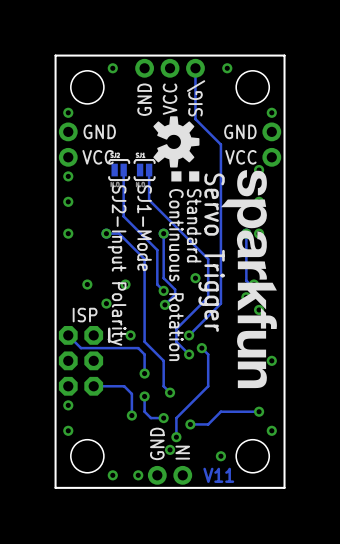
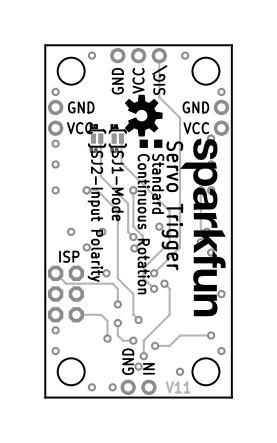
line: (109, 328) (109, 341) -> none

